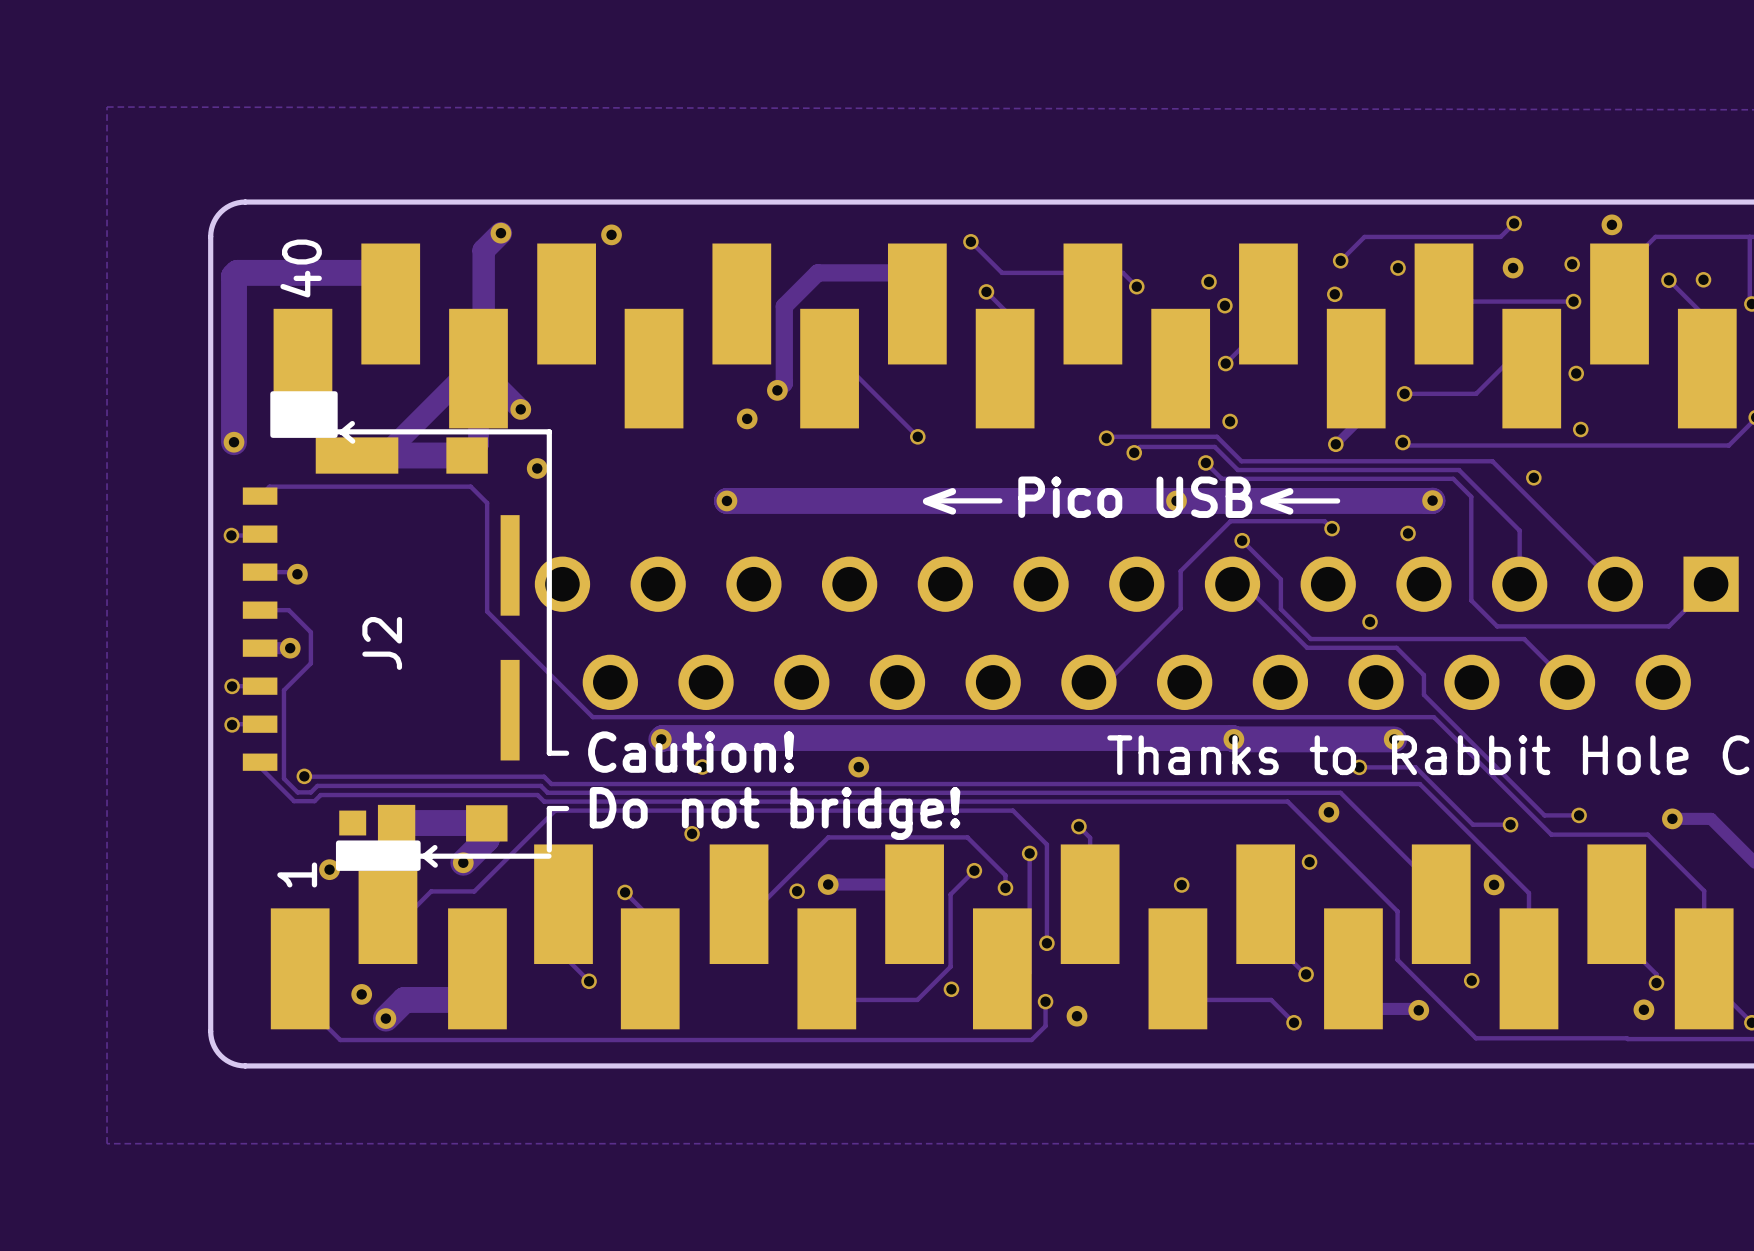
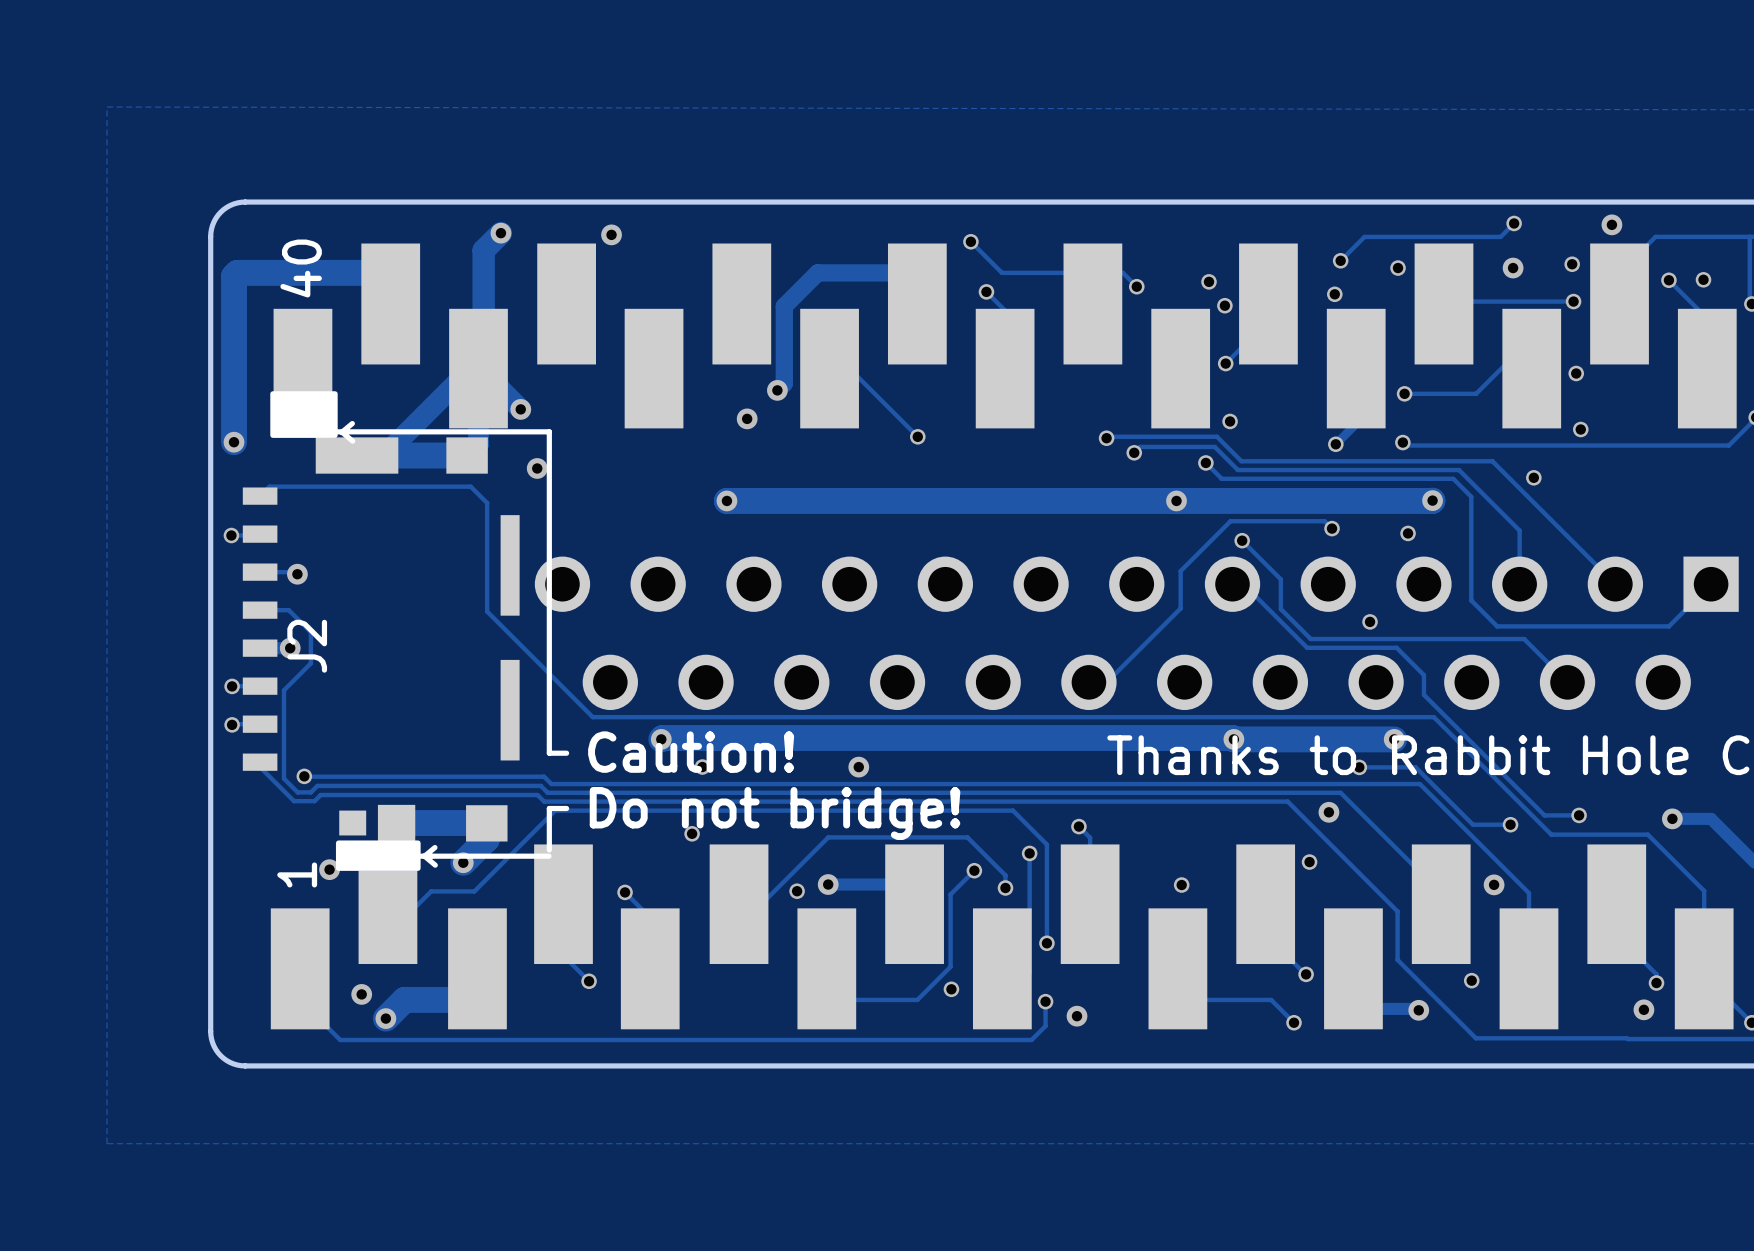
text: < Pico USB< (1108, 497) -> none
line: (926, 500) (999, 500) -> none
line: (1264, 500) (1337, 500) -> none
J2 name position: J2 (382, 643) -> J2 (307, 646)

